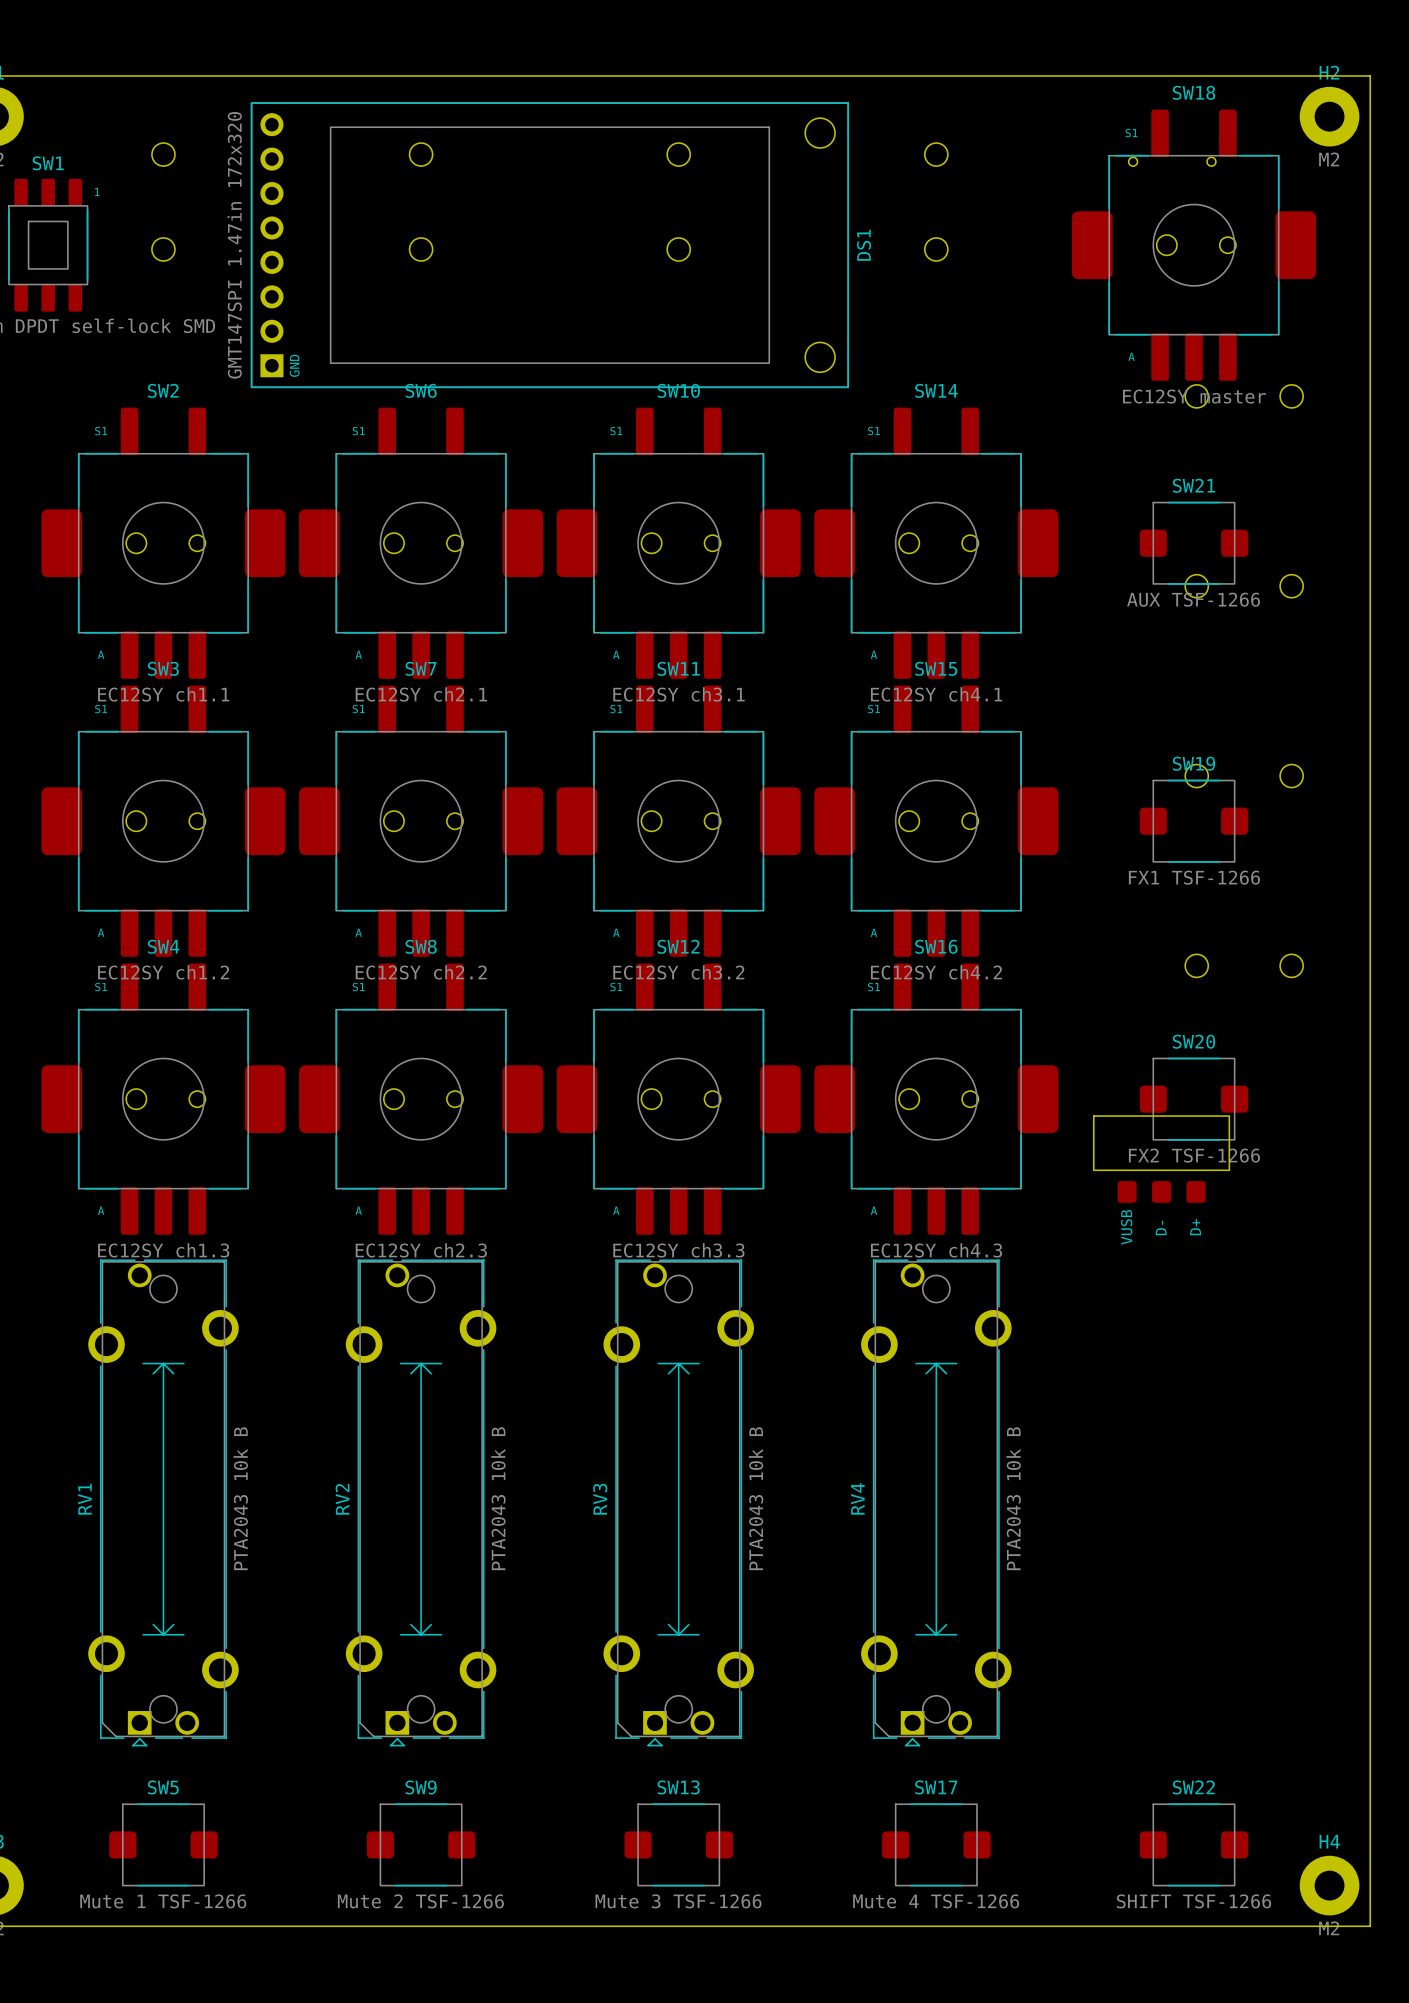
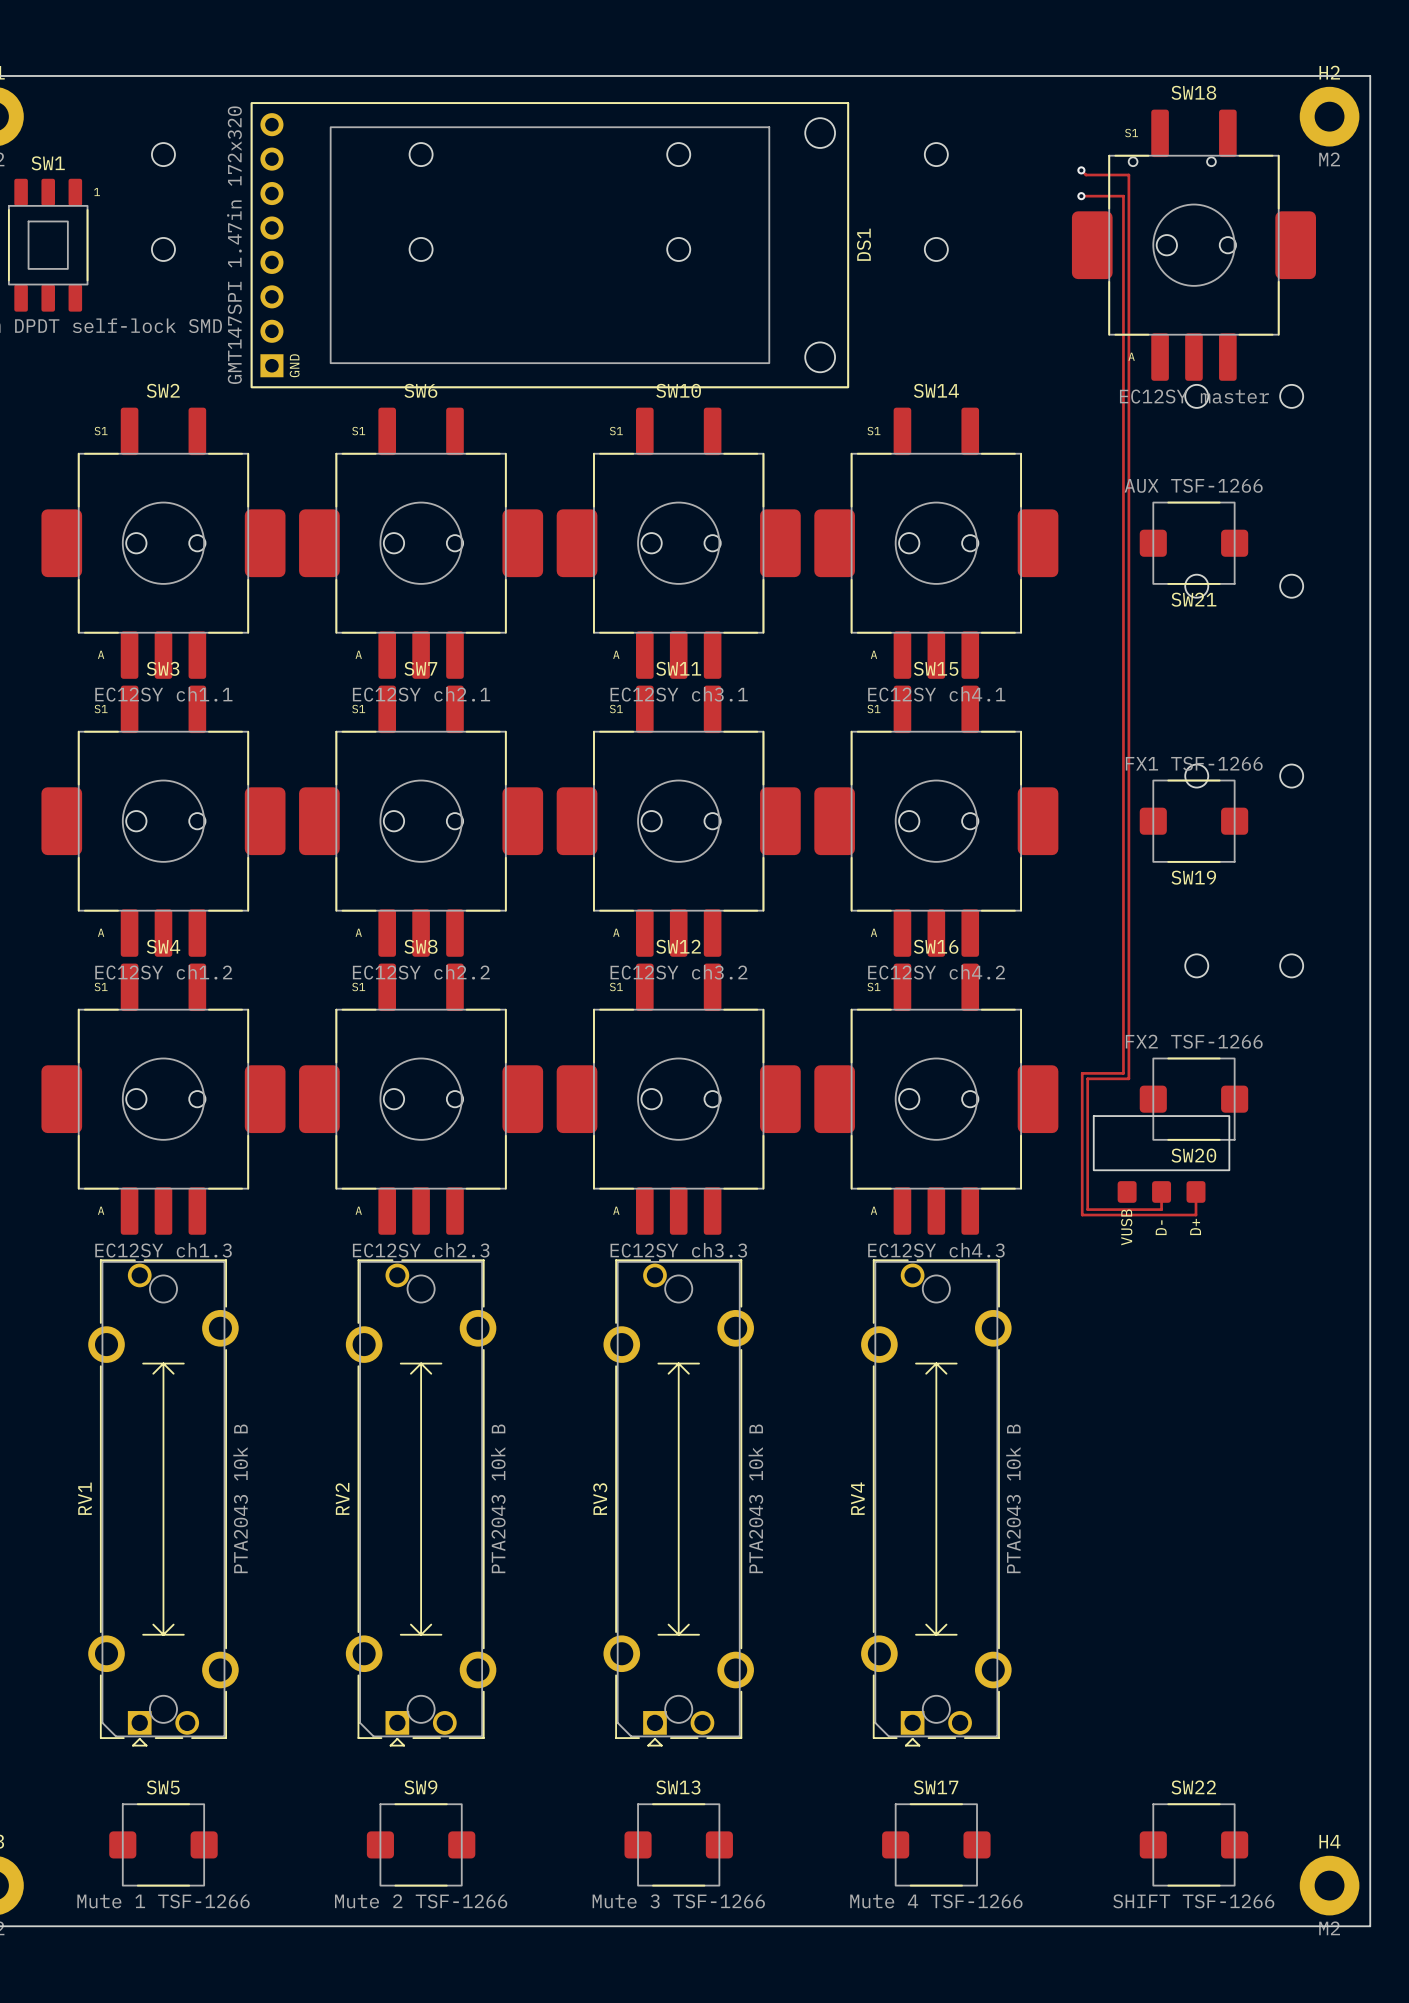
track: none -> (1081, 170) (1086, 175) (1128, 175) (1128, 1078) (1087, 1078) (1087, 1209) (1161, 1209) (1161, 1191)
via: none -> (1081, 170)
track: none -> (1081, 196) (1123, 196) (1123, 1073) (1082, 1073) (1082, 1215) (1196, 1215) (1196, 1191)
via: none -> (1081, 196)
SW21 name position: SW21 (1193, 485) -> SW21 (1193, 599)
SW21 value position: AUX TSF-1266 (1193, 599) -> AUX TSF-1266 (1193, 485)
SW19 name position: SW19 (1193, 763) -> SW19 (1193, 877)
SW19 value position: FX1 TSF-1266 (1194, 877) -> FX1 TSF-1266 (1194, 763)
SW20 name position: SW20 (1193, 1041) -> SW20 (1193, 1155)
SW20 value position: FX2 TSF-1266 (1194, 1155) -> FX2 TSF-1266 (1194, 1041)

